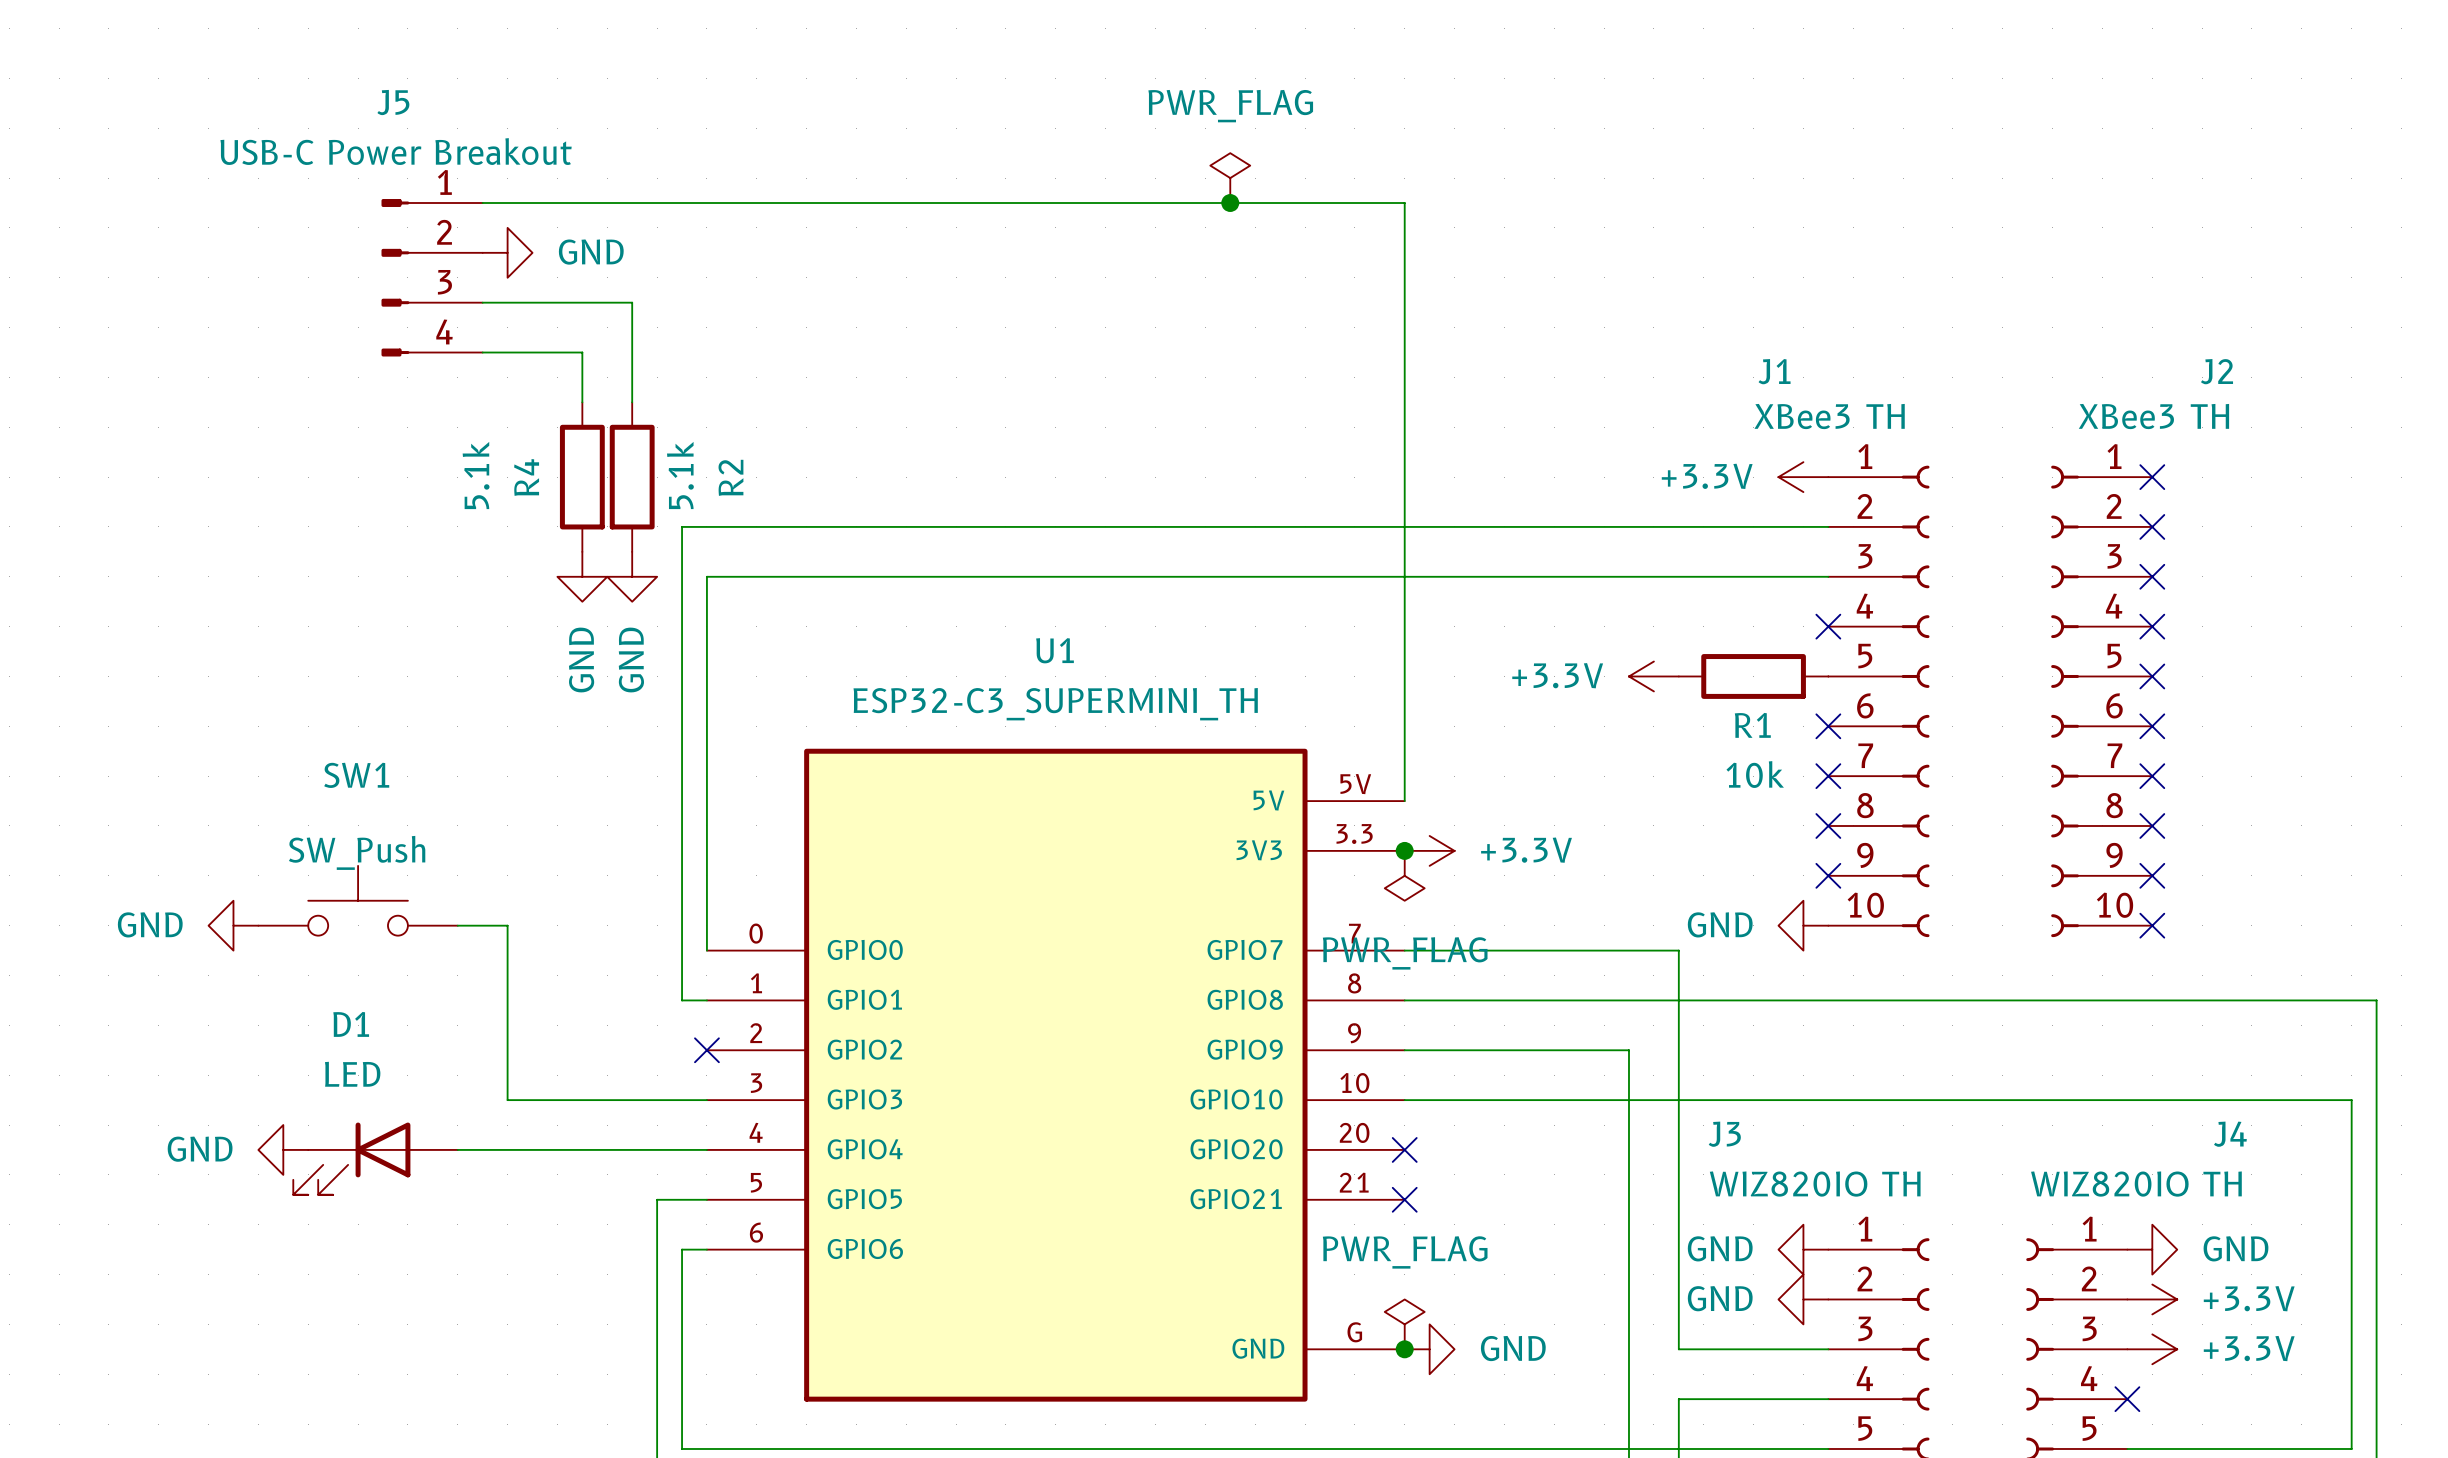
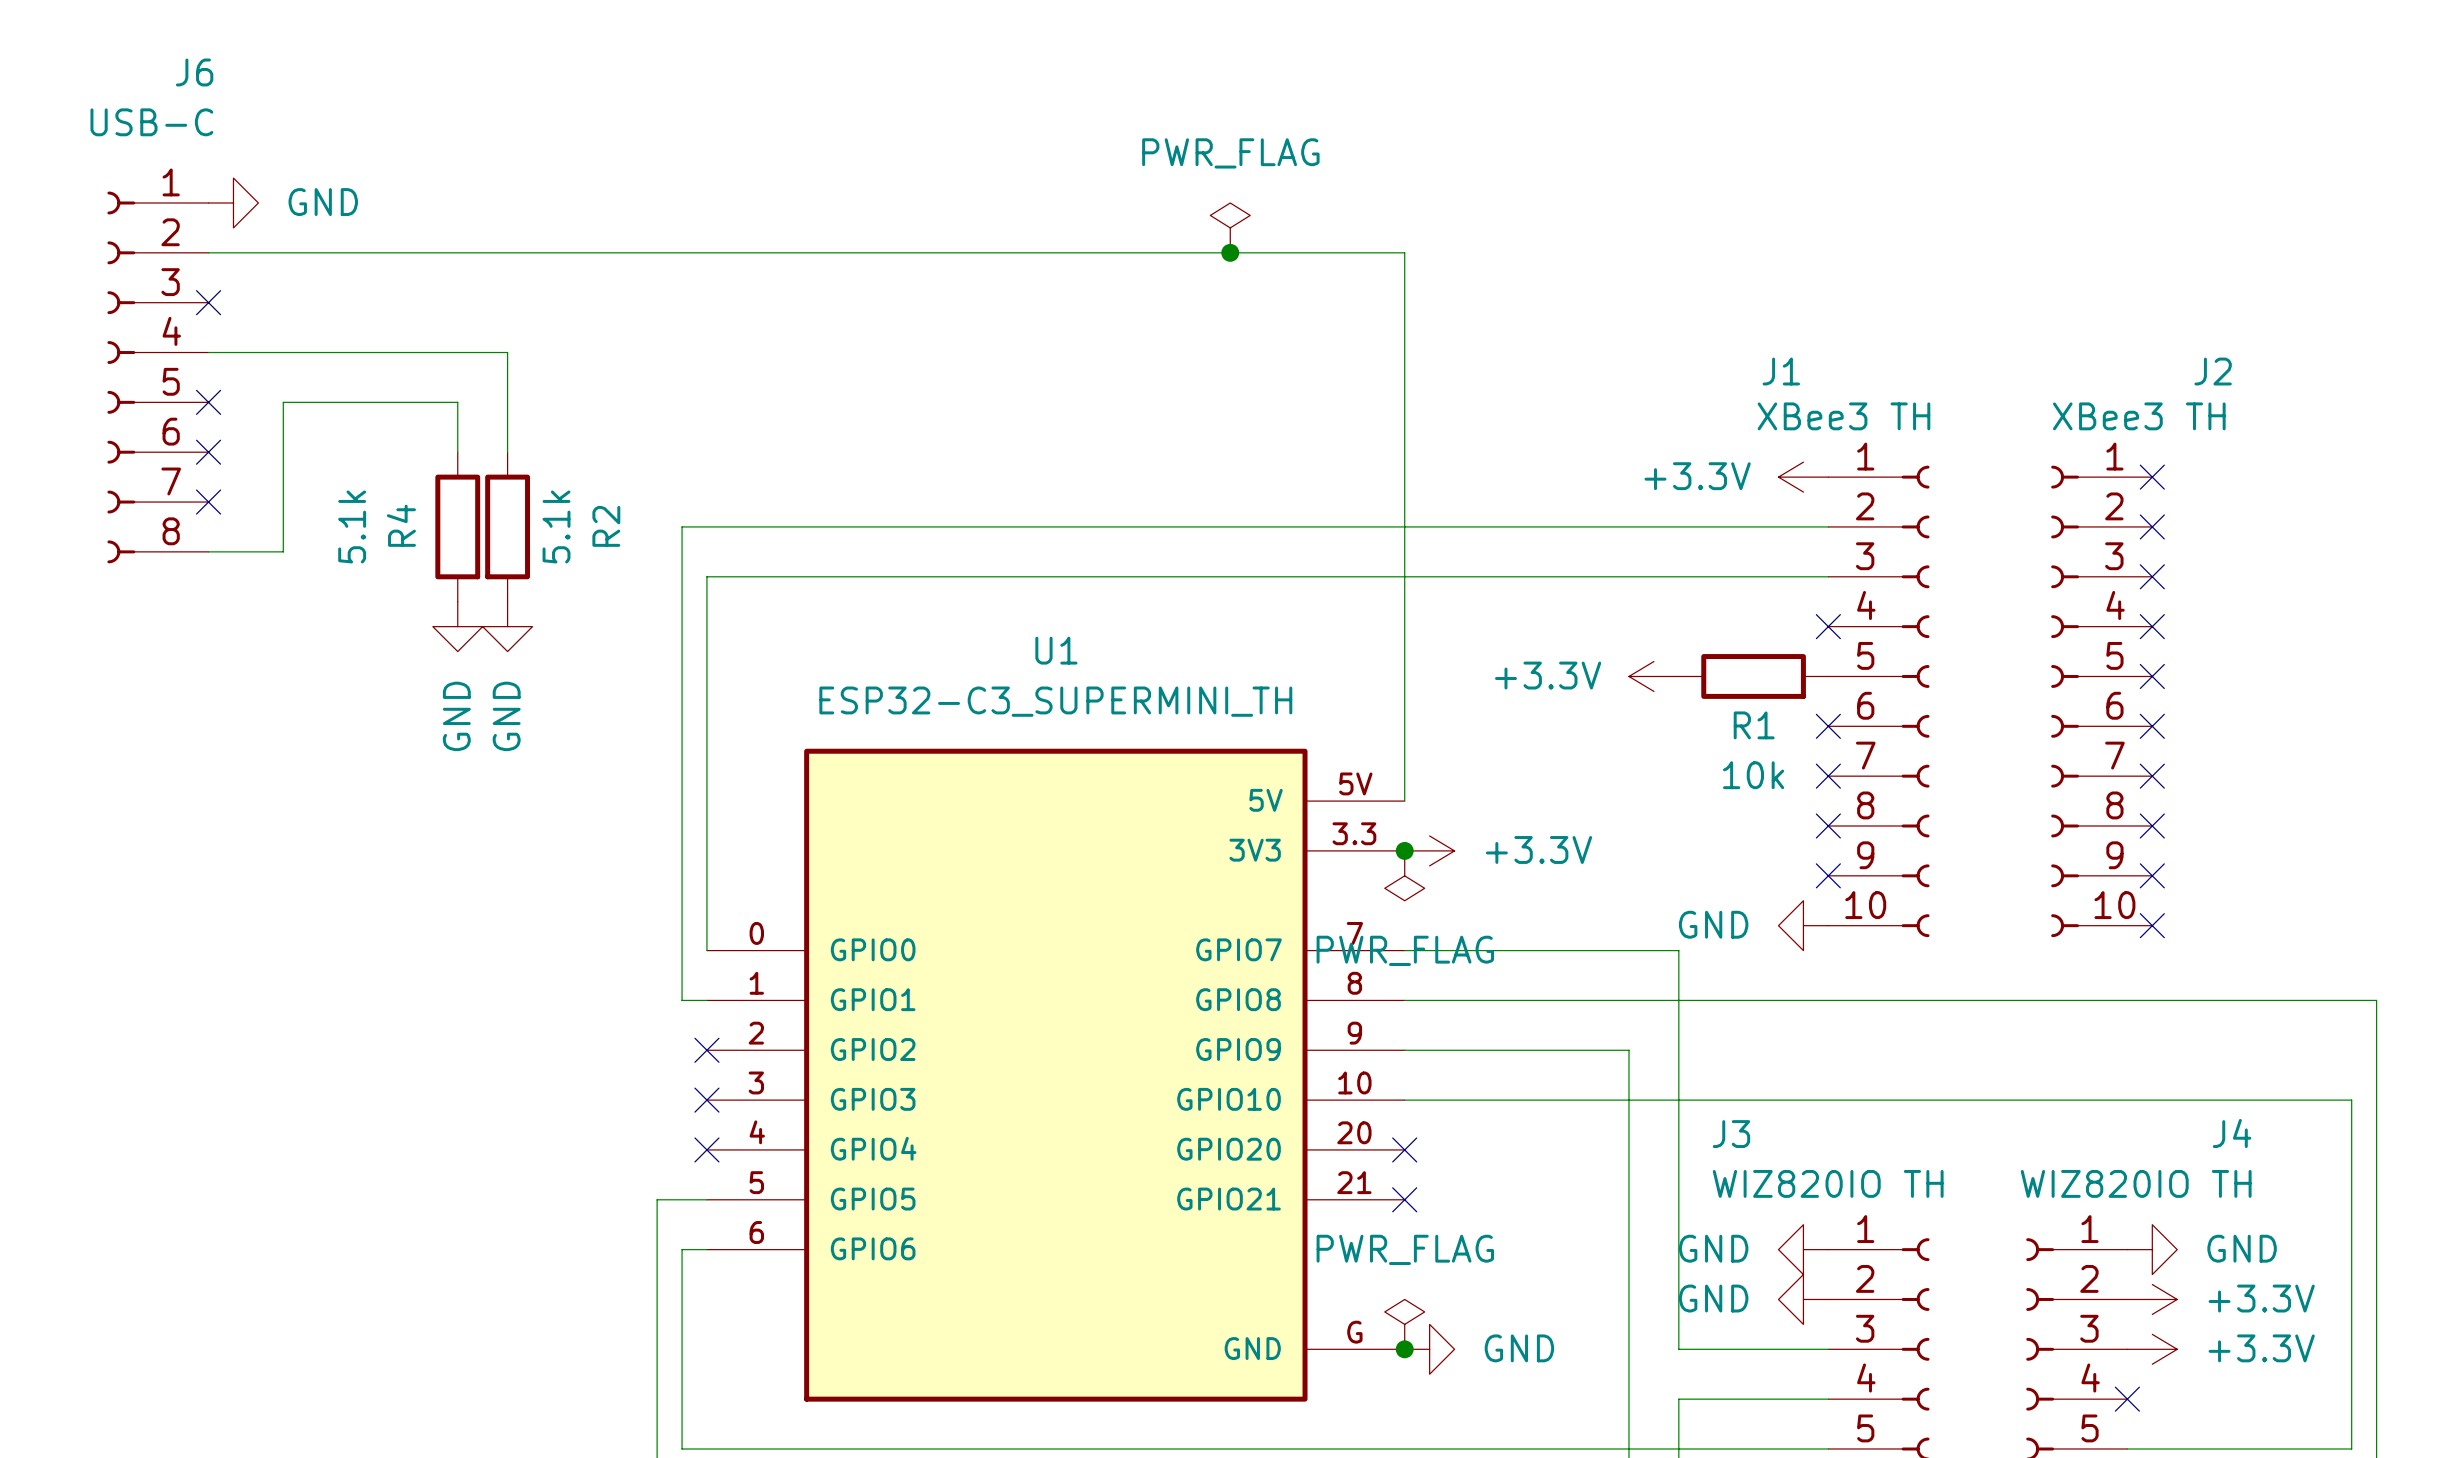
power symbol position: PWR_FLAG (1230, 178) -> PWR_FLAG (1230, 227)
power symbol: none -> GND (233, 203)
wire: (482, 203) (1404, 203) (1404, 252) -> (208, 252) (1404, 252)
junction position: (1230, 203) -> (1230, 252)
power symbol: GND (507, 252) -> none
J5: USB-C Power Breakout (432, 277) -> none
no-connect mark: none -> (208, 302)
wire: (482, 302) (632, 302) (632, 402) -> none
wire: none -> (208, 352) (482, 352)
wire: (507, 352) (582, 352) (582, 402) -> (507, 352) (507, 452)
J6: none -> USB-C (157, 377)
no-connect mark: none -> (208, 402)
no-connect mark: none -> (208, 452)
wire: none -> (457, 452) (457, 402) (283, 402) (283, 551) (208, 551)
R4 position: (582, 477) -> (457, 526)
R2 position: (632, 477) -> (507, 526)
no-connect mark: none -> (208, 502)
power symbol: GND (582, 576) -> none
power symbol: GND (632, 576) -> none
power symbol: none -> GND (457, 626)
power symbol: none -> GND (507, 626)
SW1: SW_Push (358, 900) -> none
power symbol: GND (233, 925) -> none
wire: (457, 925) (507, 925) (507, 1100) (706, 1100) -> none
no-connect mark: none -> (706, 1100)
power symbol: GND (283, 1149) -> none
wire: (457, 1149) (706, 1149) -> none
no-connect mark: none -> (706, 1149)
D1: LED (375, 1158) -> none

